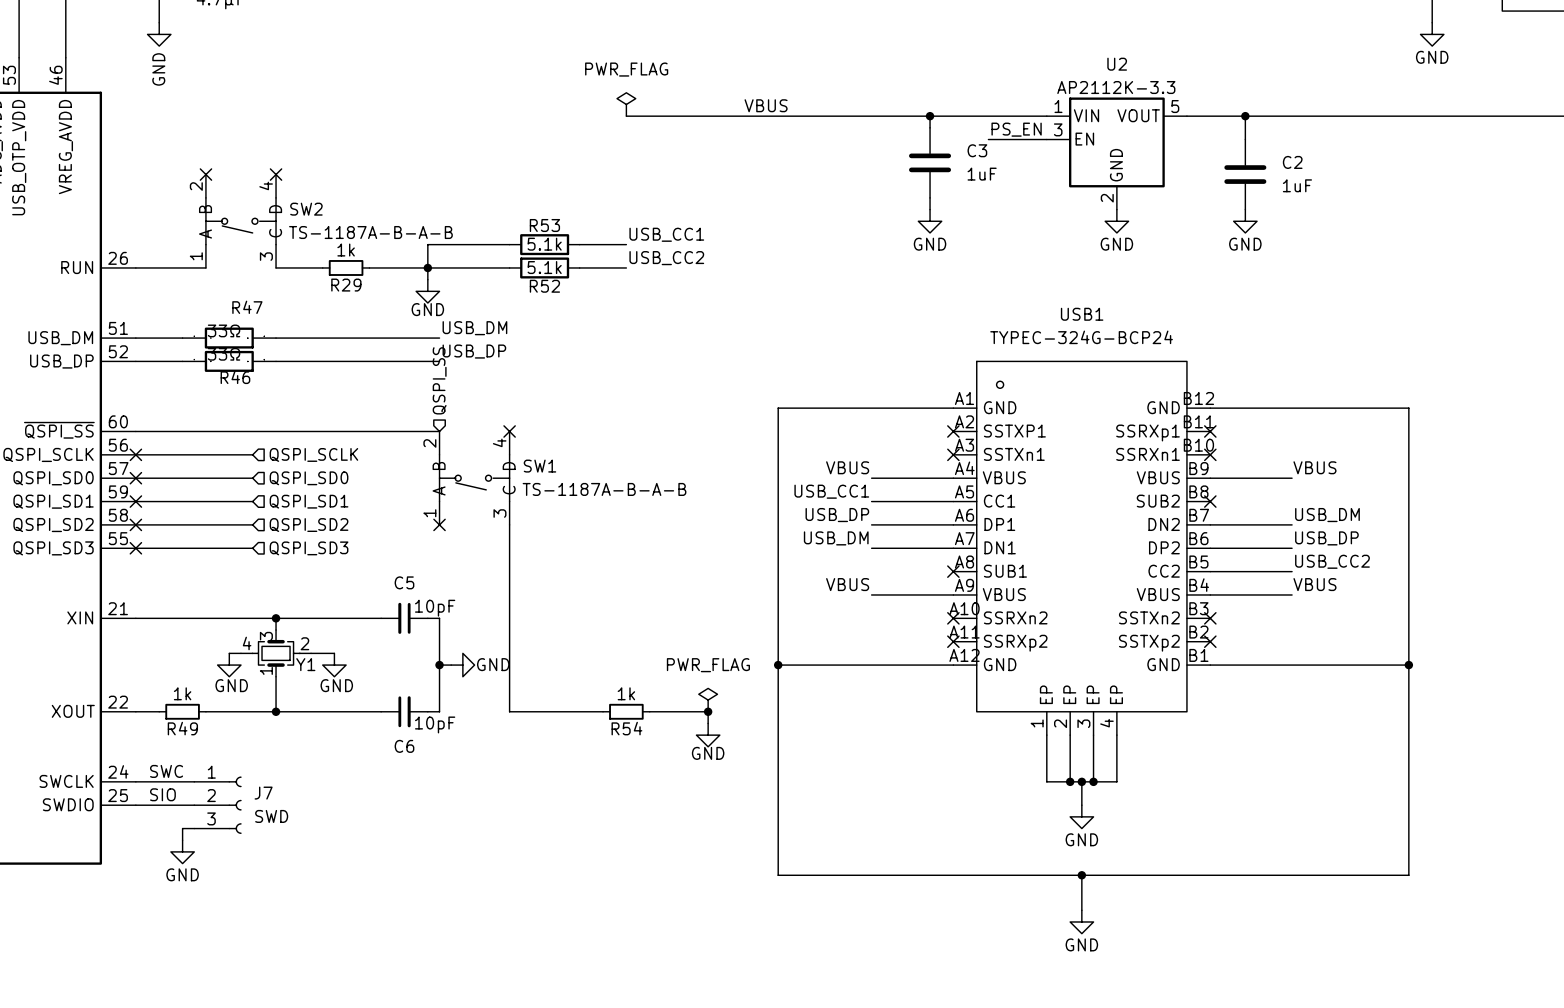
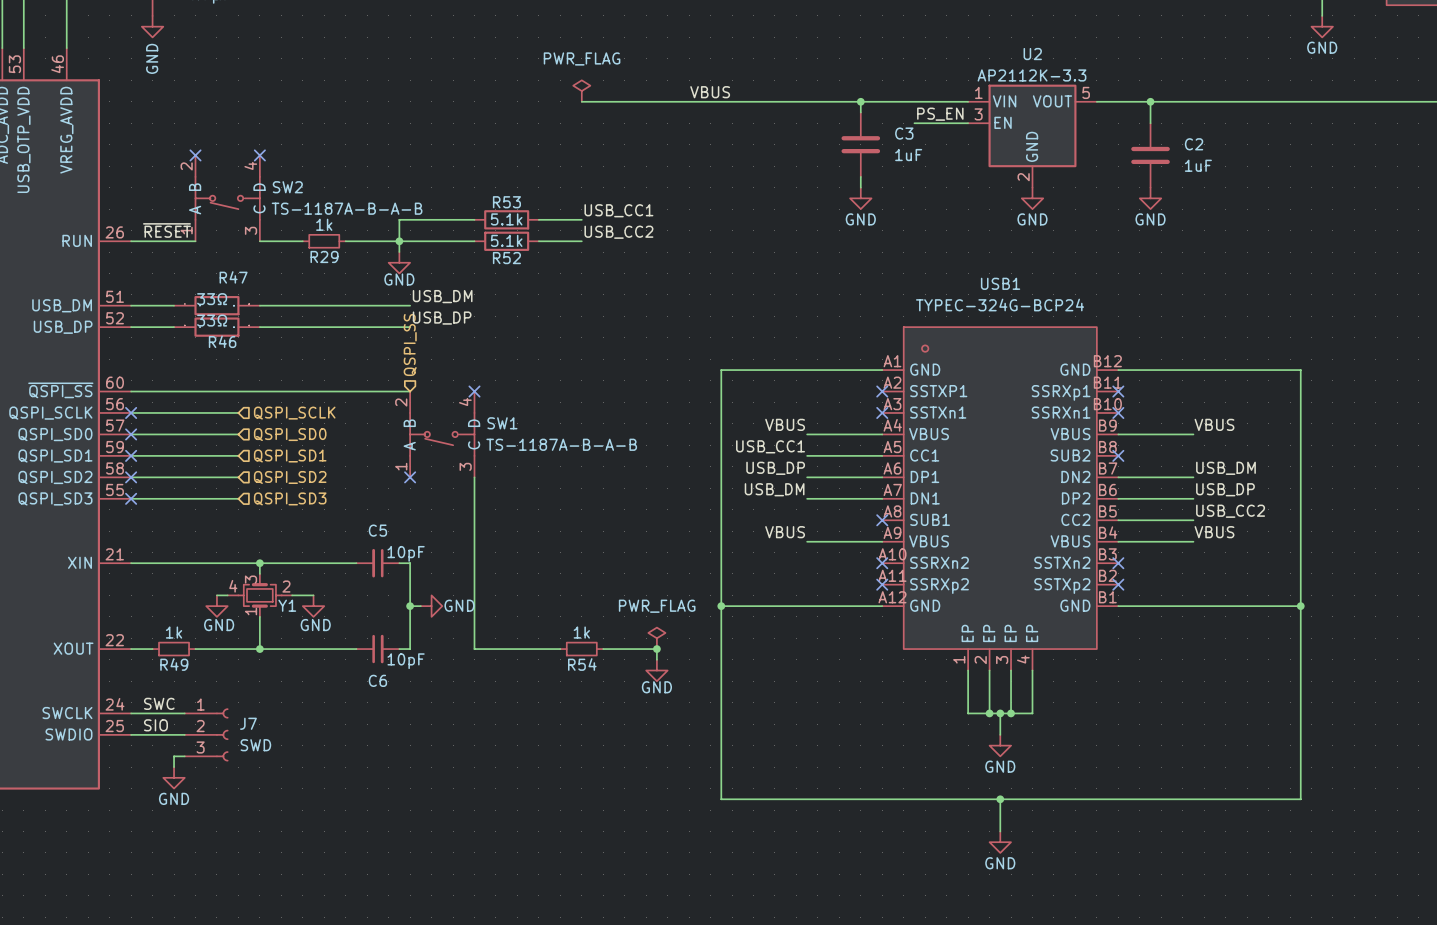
label: none -> ~{RESET} (166, 230)

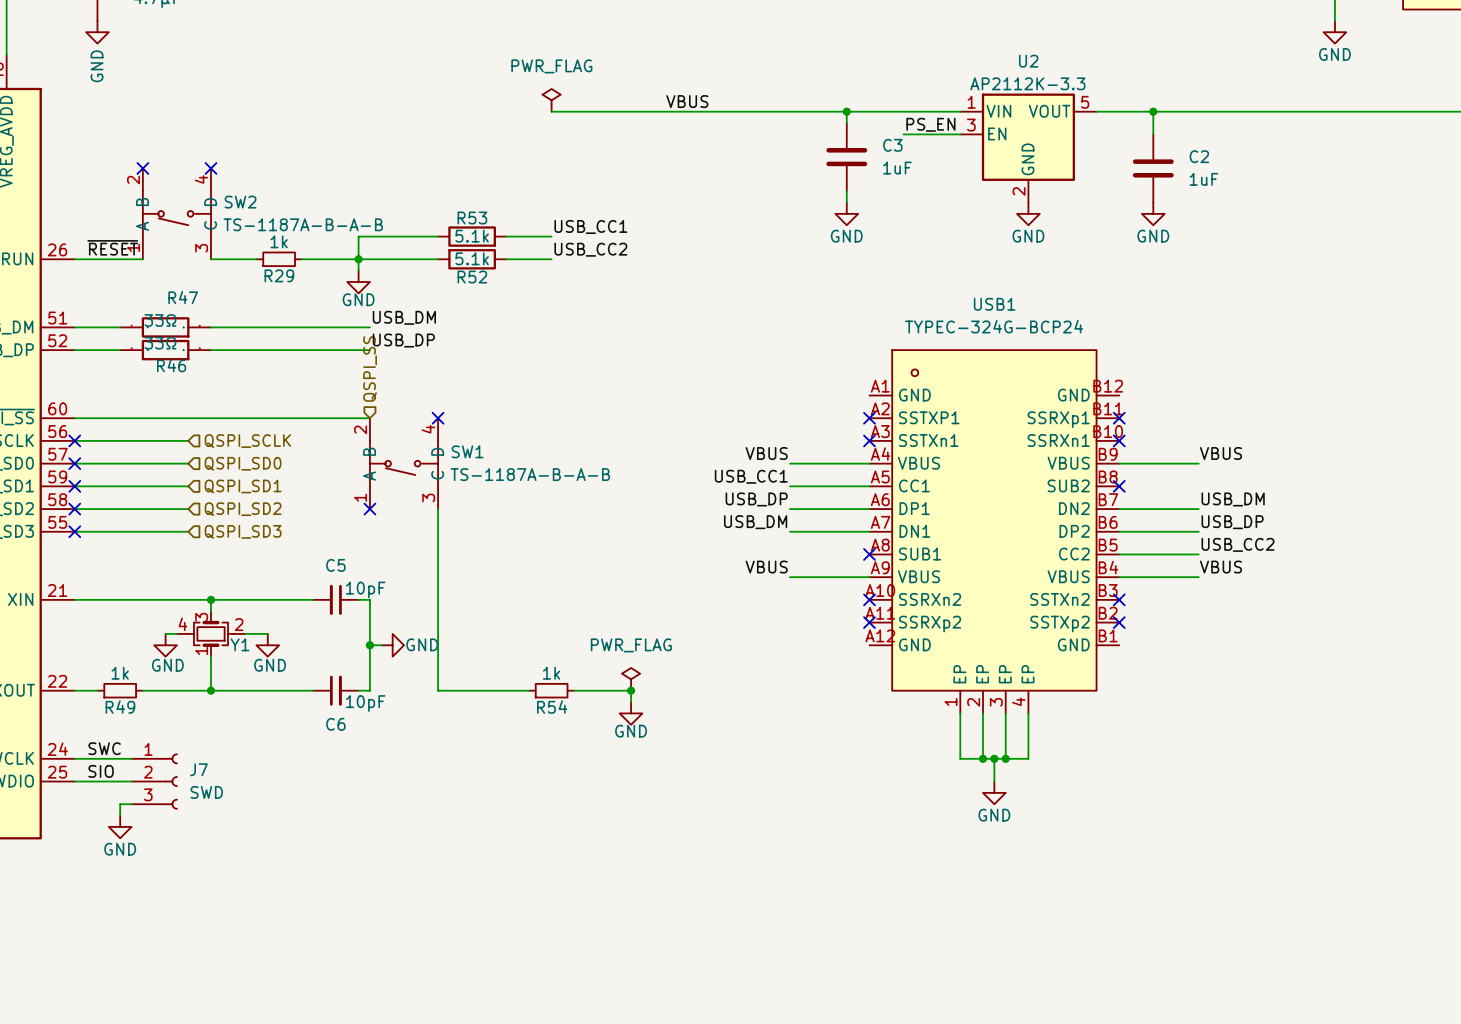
wire: (882, 370) (721, 370) (721, 799) (1300, 799) (1300, 370) (1118, 370) -> none
wire: (721, 606) (882, 606) -> none
junction: (721, 606) -> none
wire: (1118, 606) (1300, 606) -> none
junction: (1300, 606) -> none
wire: (1000, 799) (1000, 831) -> none
junction: (1000, 799) -> none
power symbol: GND (1000, 842) -> none

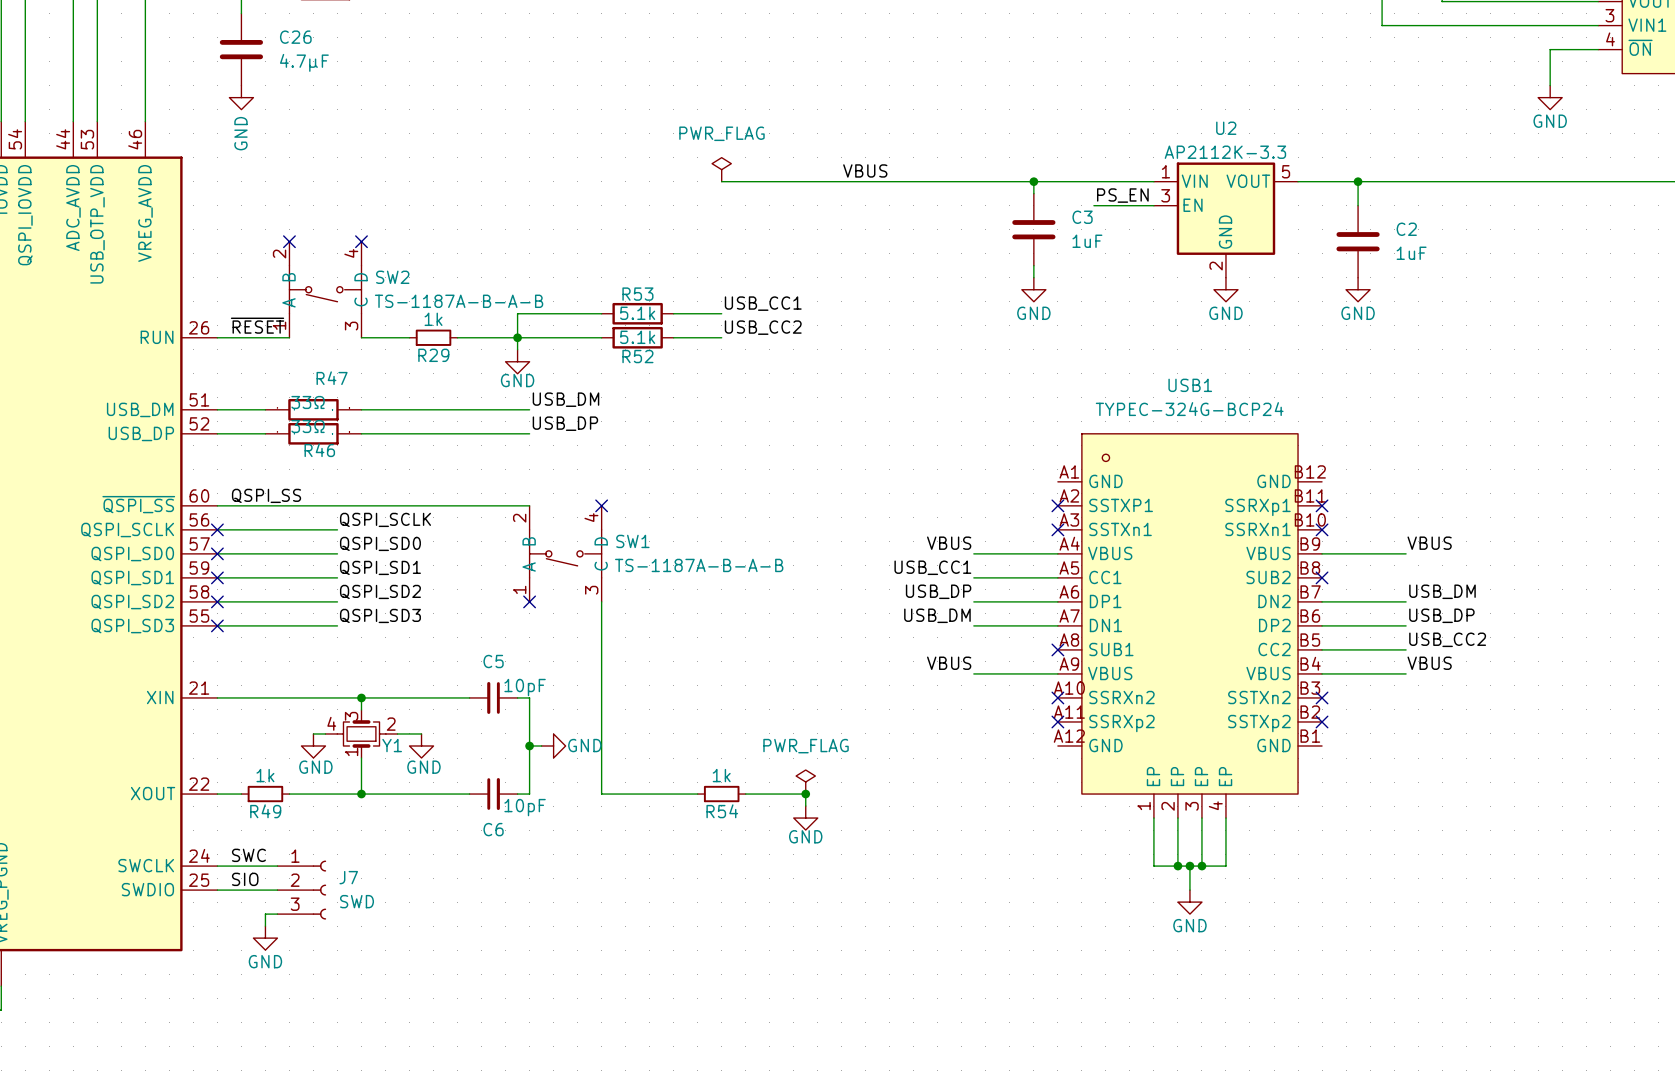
hierarchical label: QSPI_SS (370, 369) -> none
label: none -> QSPI_SS (266, 495)
label: none -> QSPI_SCLK (385, 519)
hierarchical label: QSPI_SCLK (247, 441) -> none
label: none -> QSPI_SD0 (380, 543)
hierarchical label: QSPI_SD0 (243, 463) -> none
label: none -> QSPI_SD1 (380, 567)
hierarchical label: QSPI_SD1 (243, 486) -> none
label: none -> QSPI_SD2 (380, 591)
hierarchical label: QSPI_SD2 (243, 509) -> none
label: none -> QSPI_SD3 (380, 615)
hierarchical label: QSPI_SD3 (243, 531) -> none

